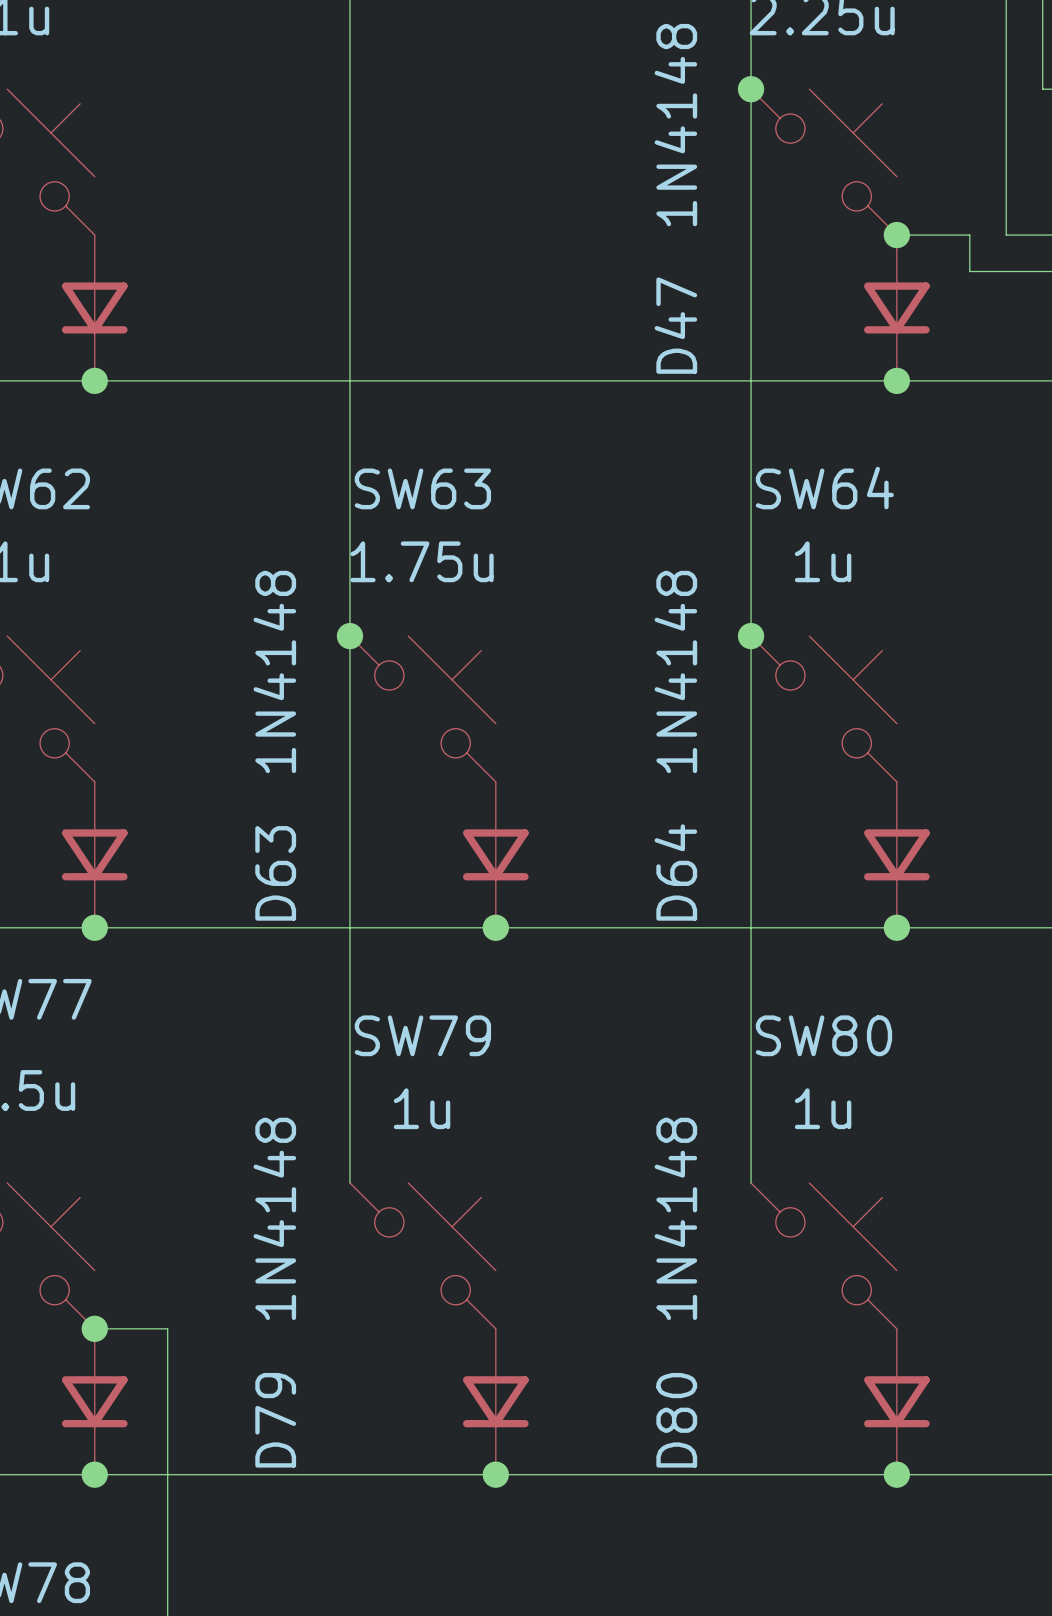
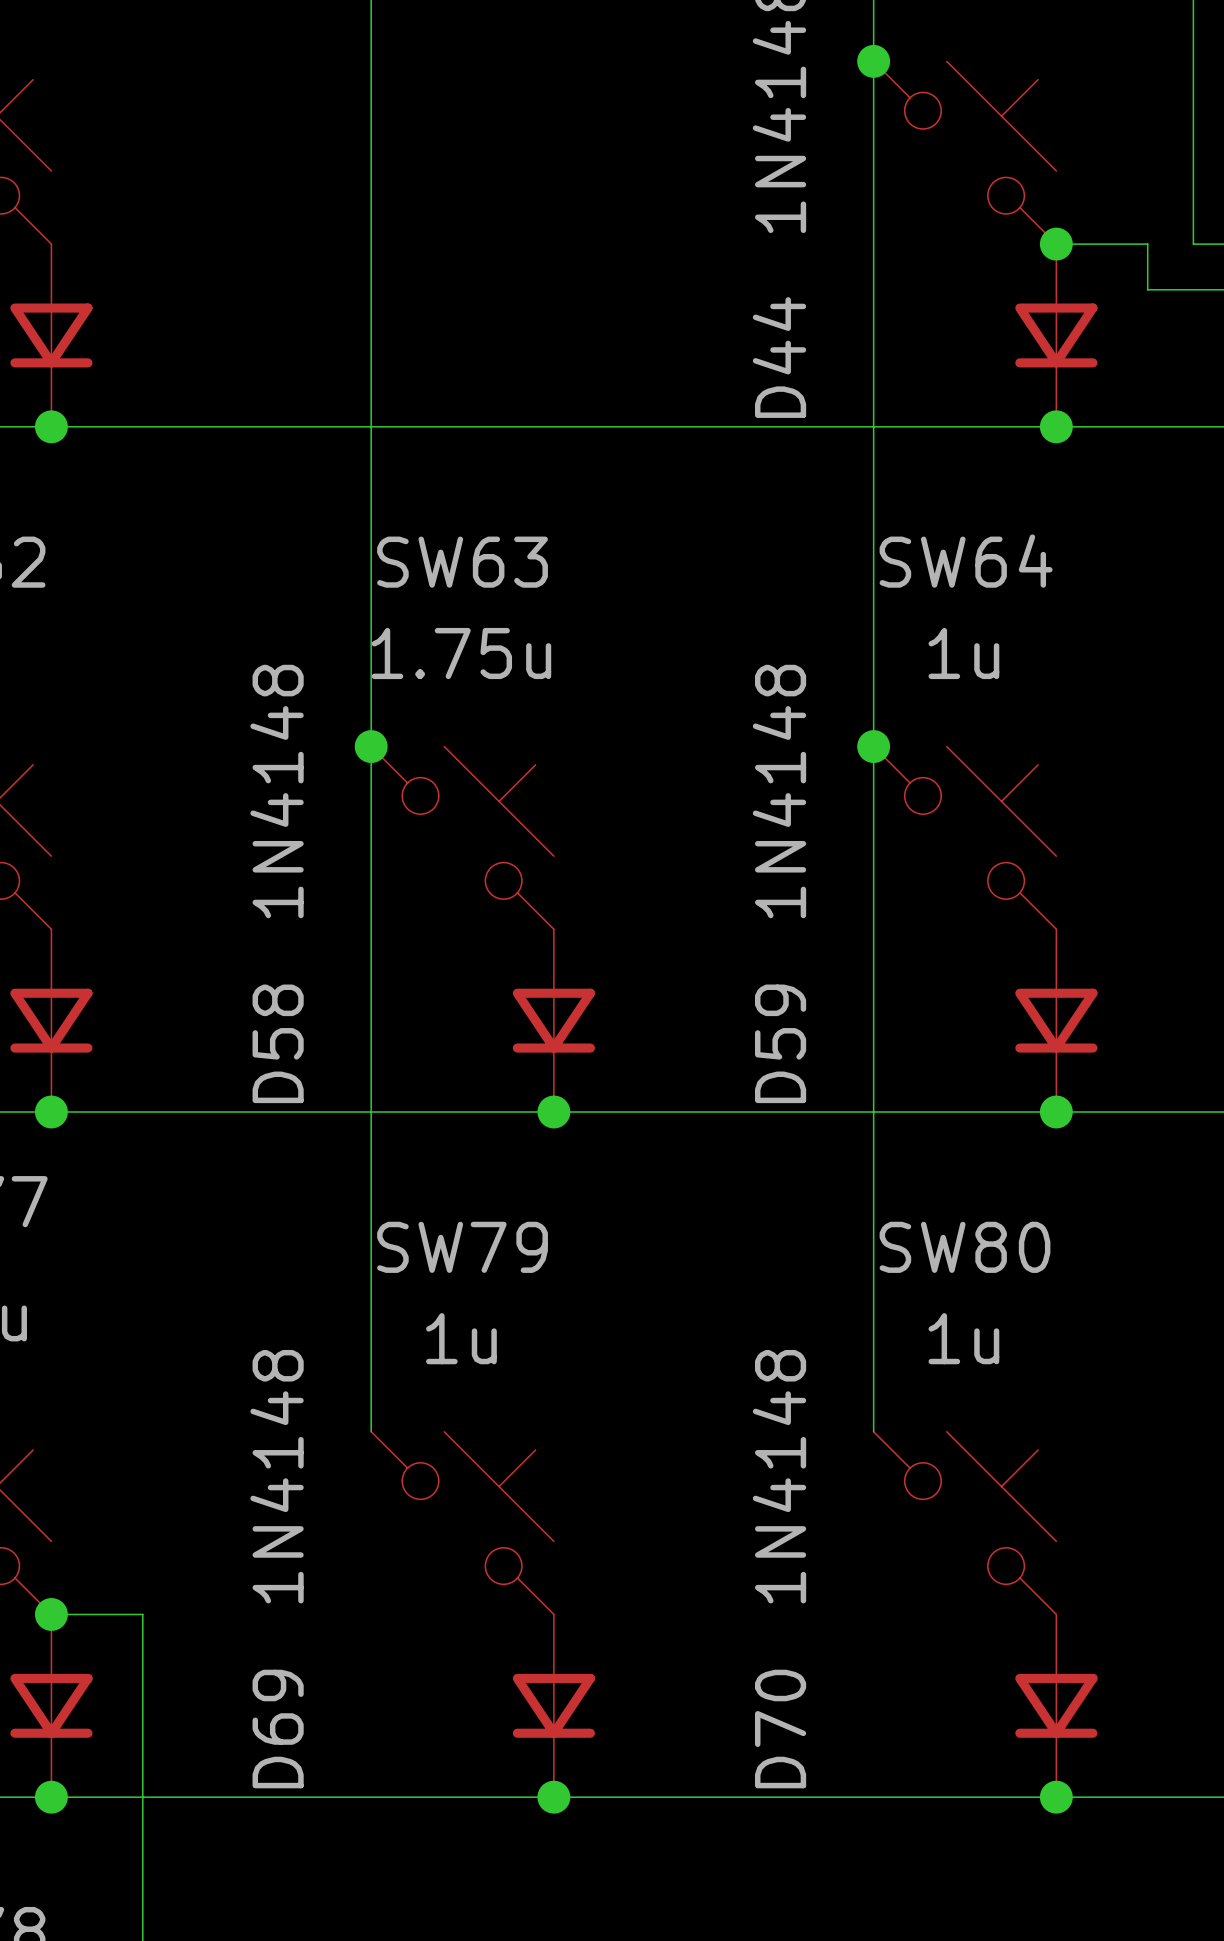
D47 name: D47 (675, 325) -> D44 (779, 357)
D64 name: D64 (675, 872) -> D59 (780, 1043)
D63 name: D63 (275, 873) -> D58 (278, 1043)
D79 name: D79 (275, 1420) -> D69 (278, 1729)
D80 name: D80 (676, 1420) -> D70 (780, 1729)

